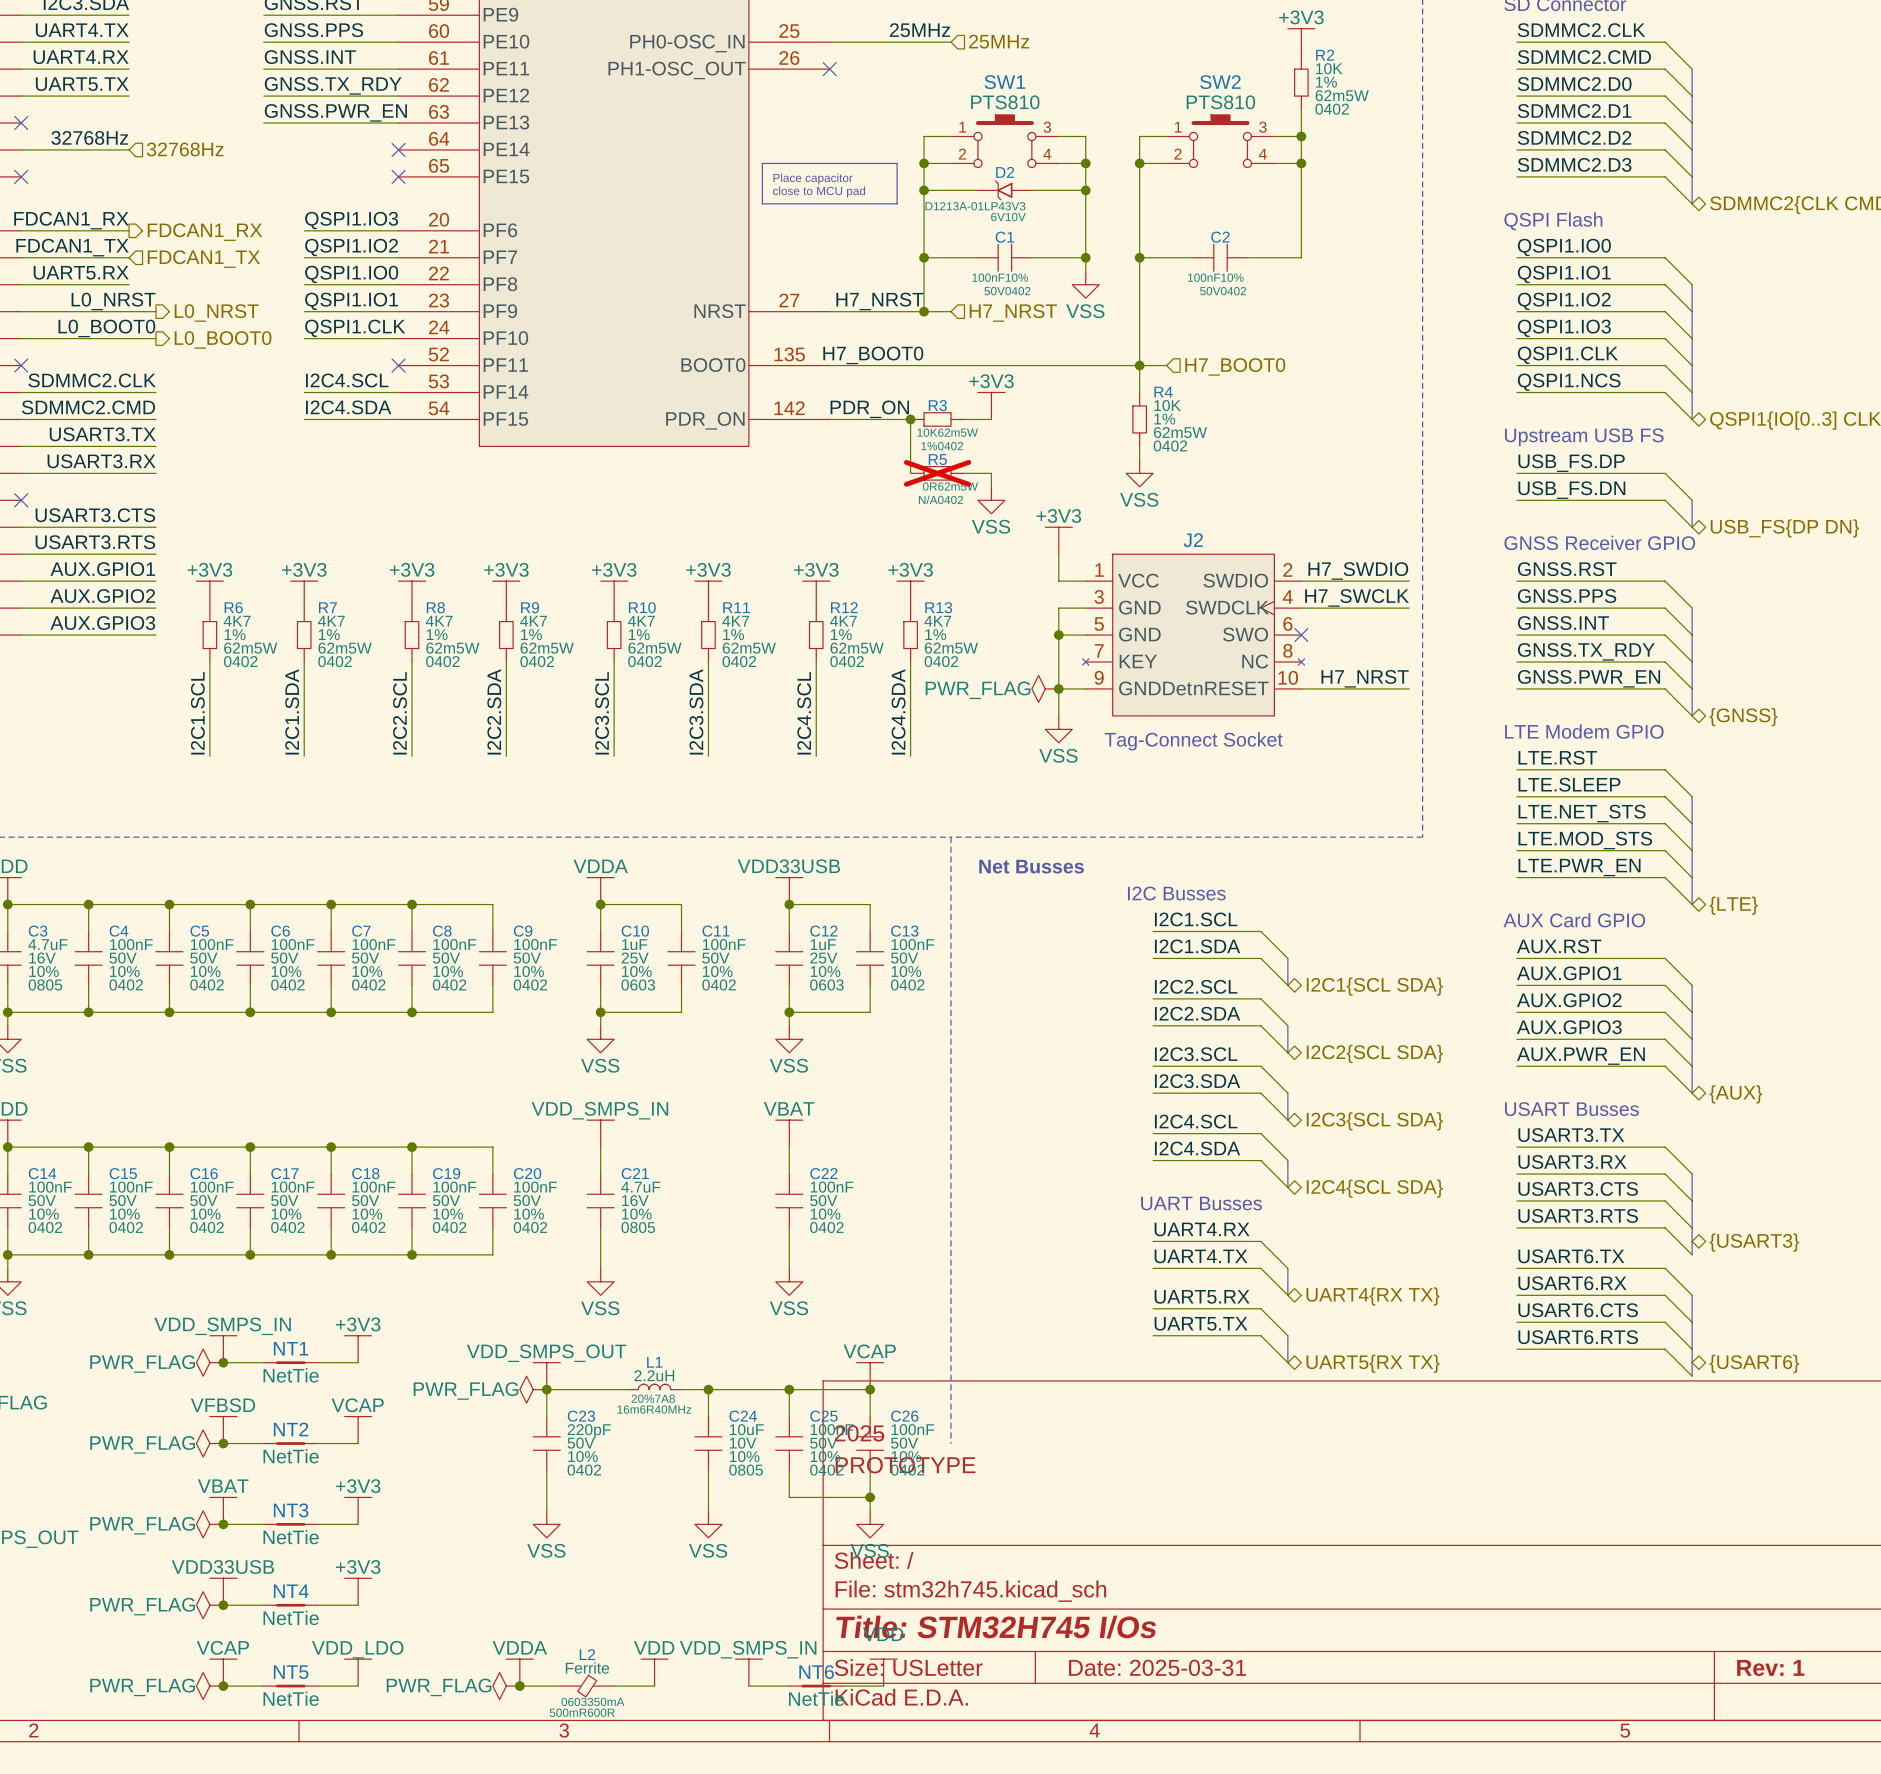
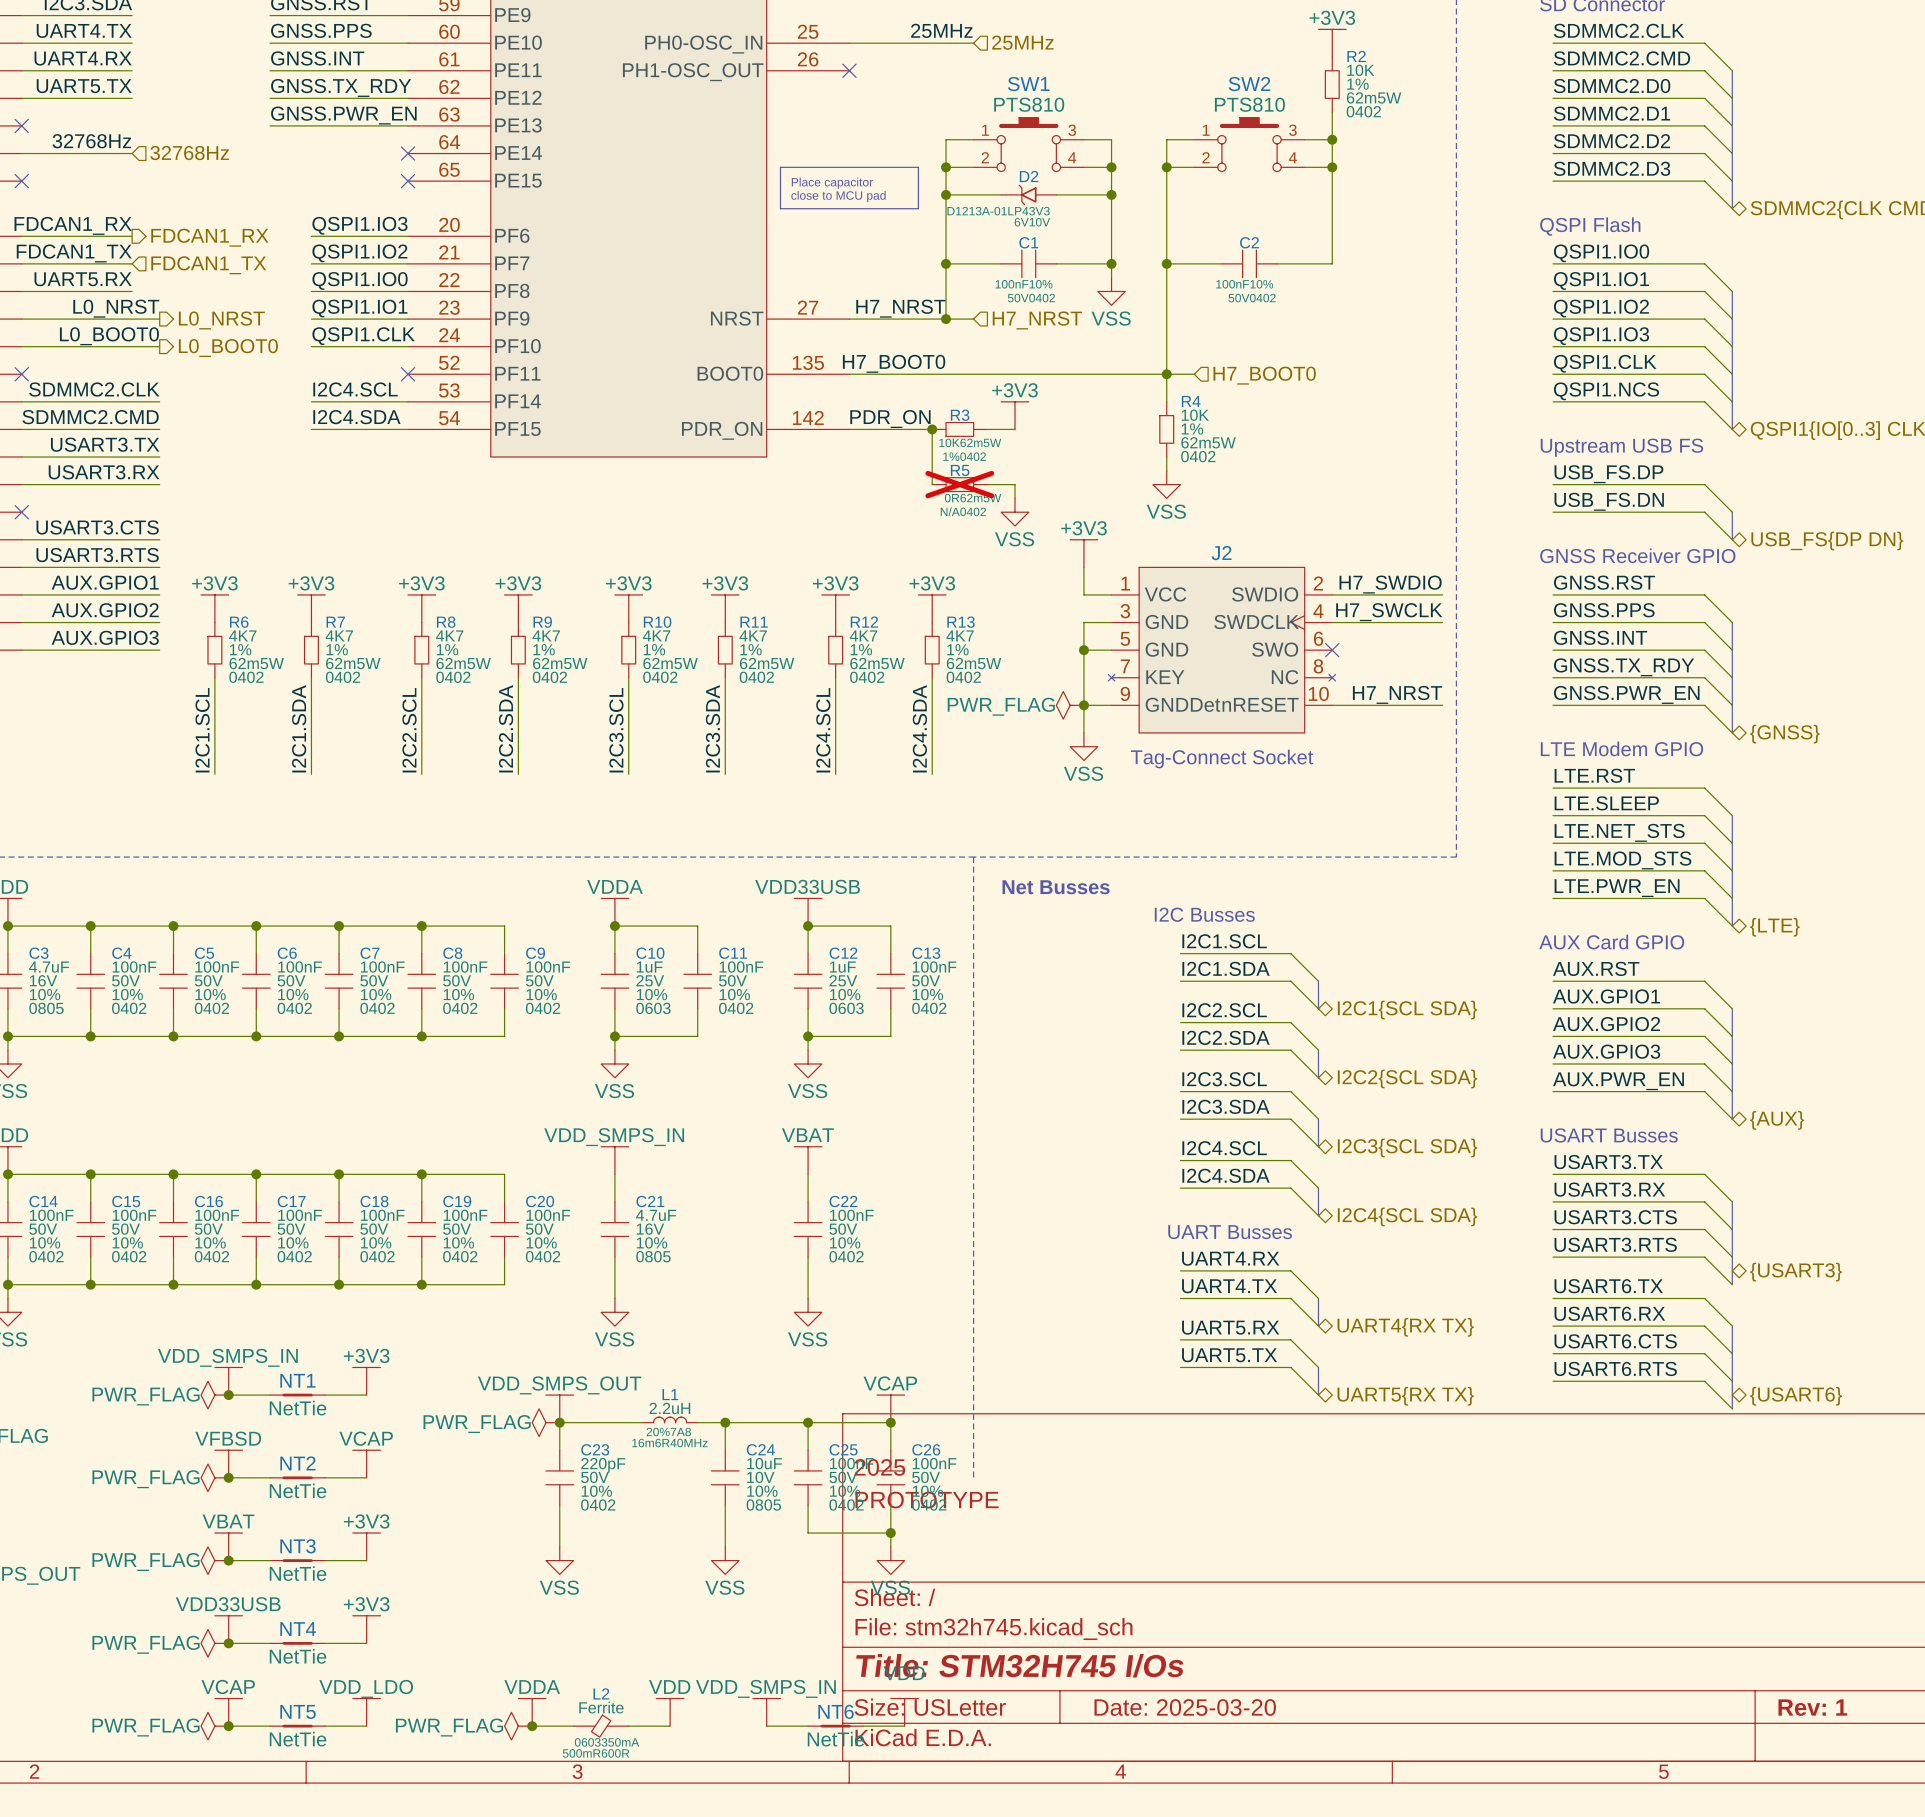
title block: Date: 2025-03-31 (1157, 1667) -> Date: 2025-03-20 (1185, 1707)

